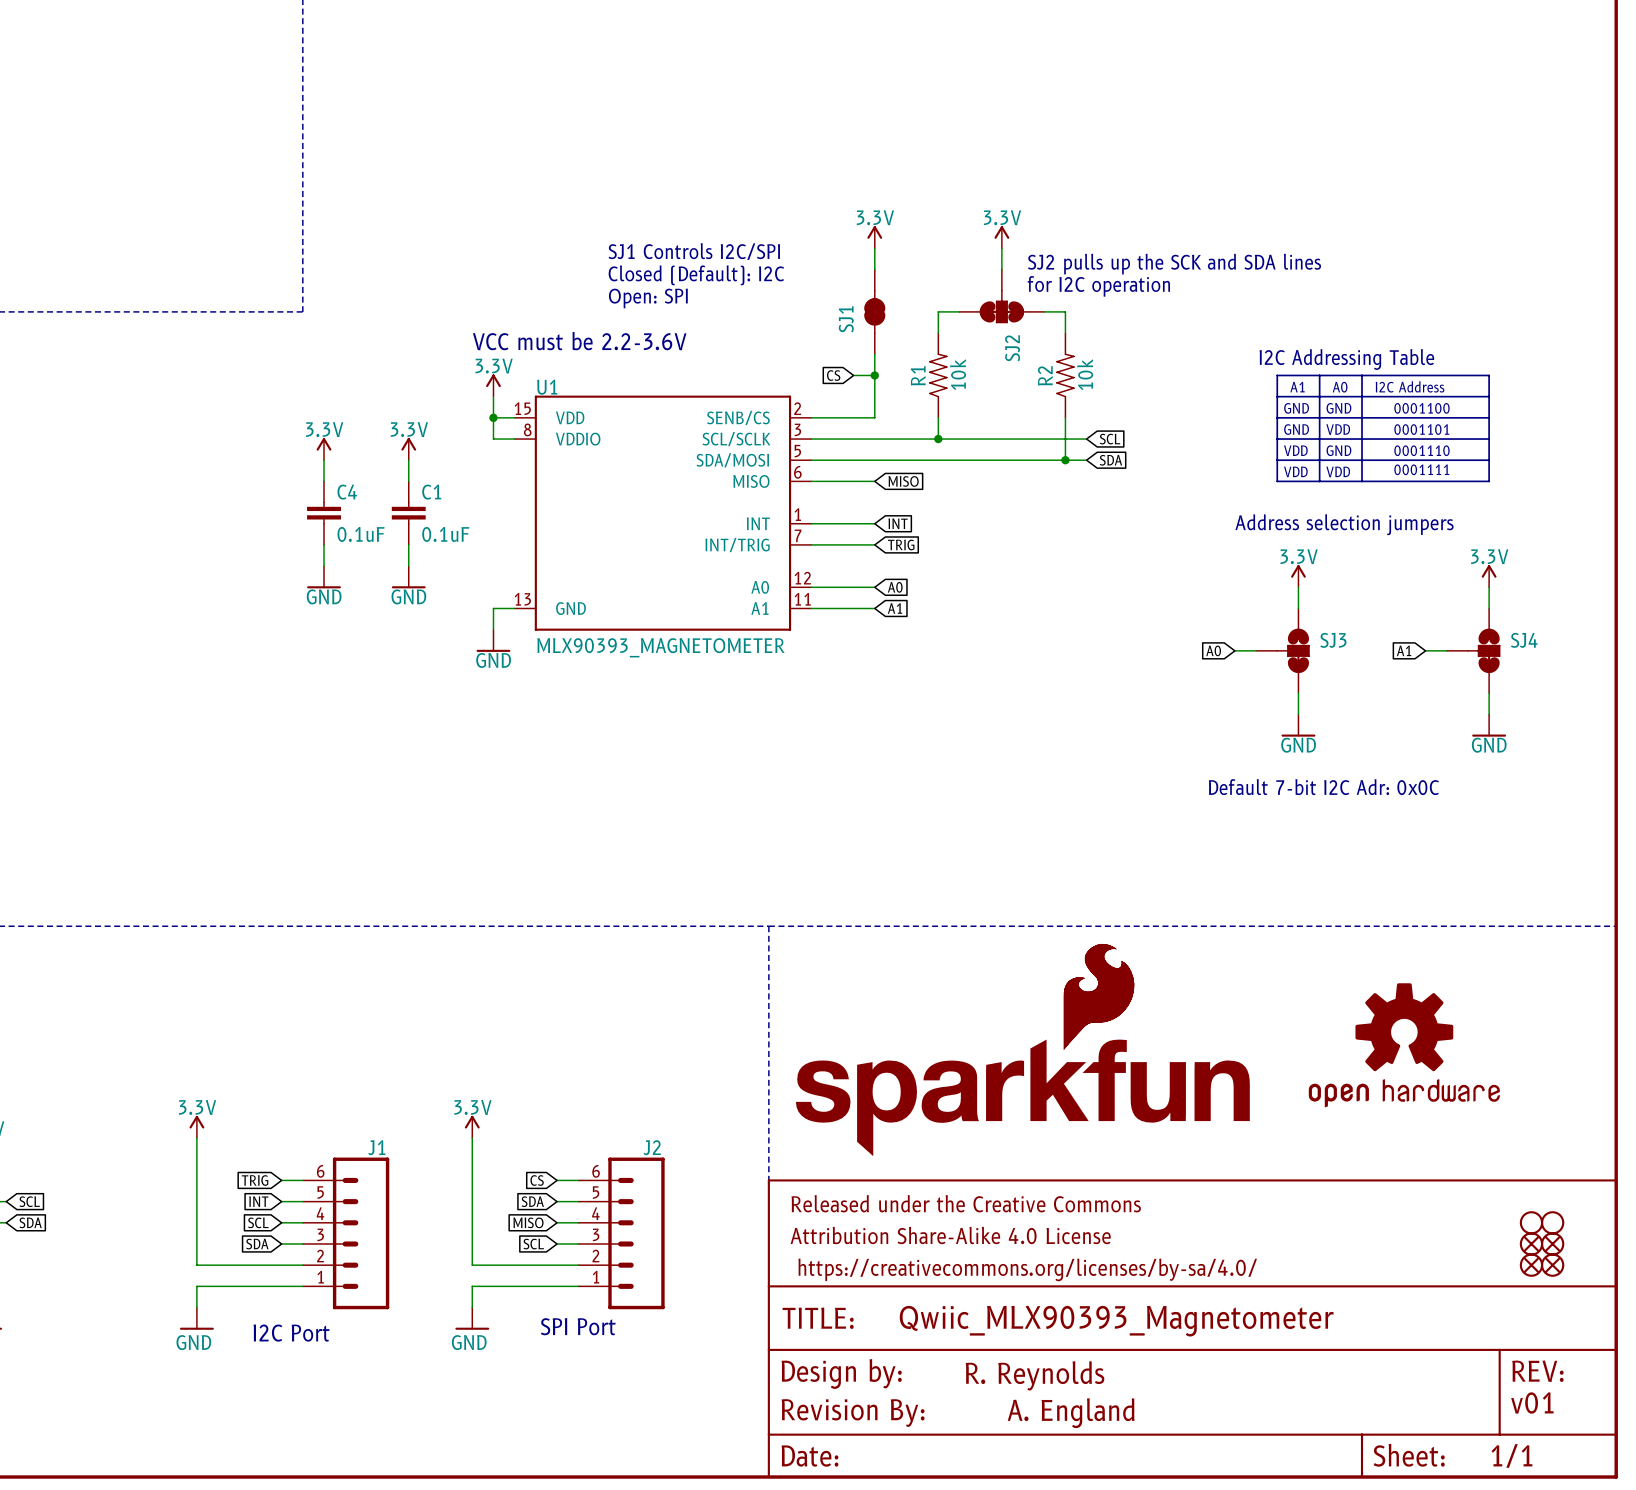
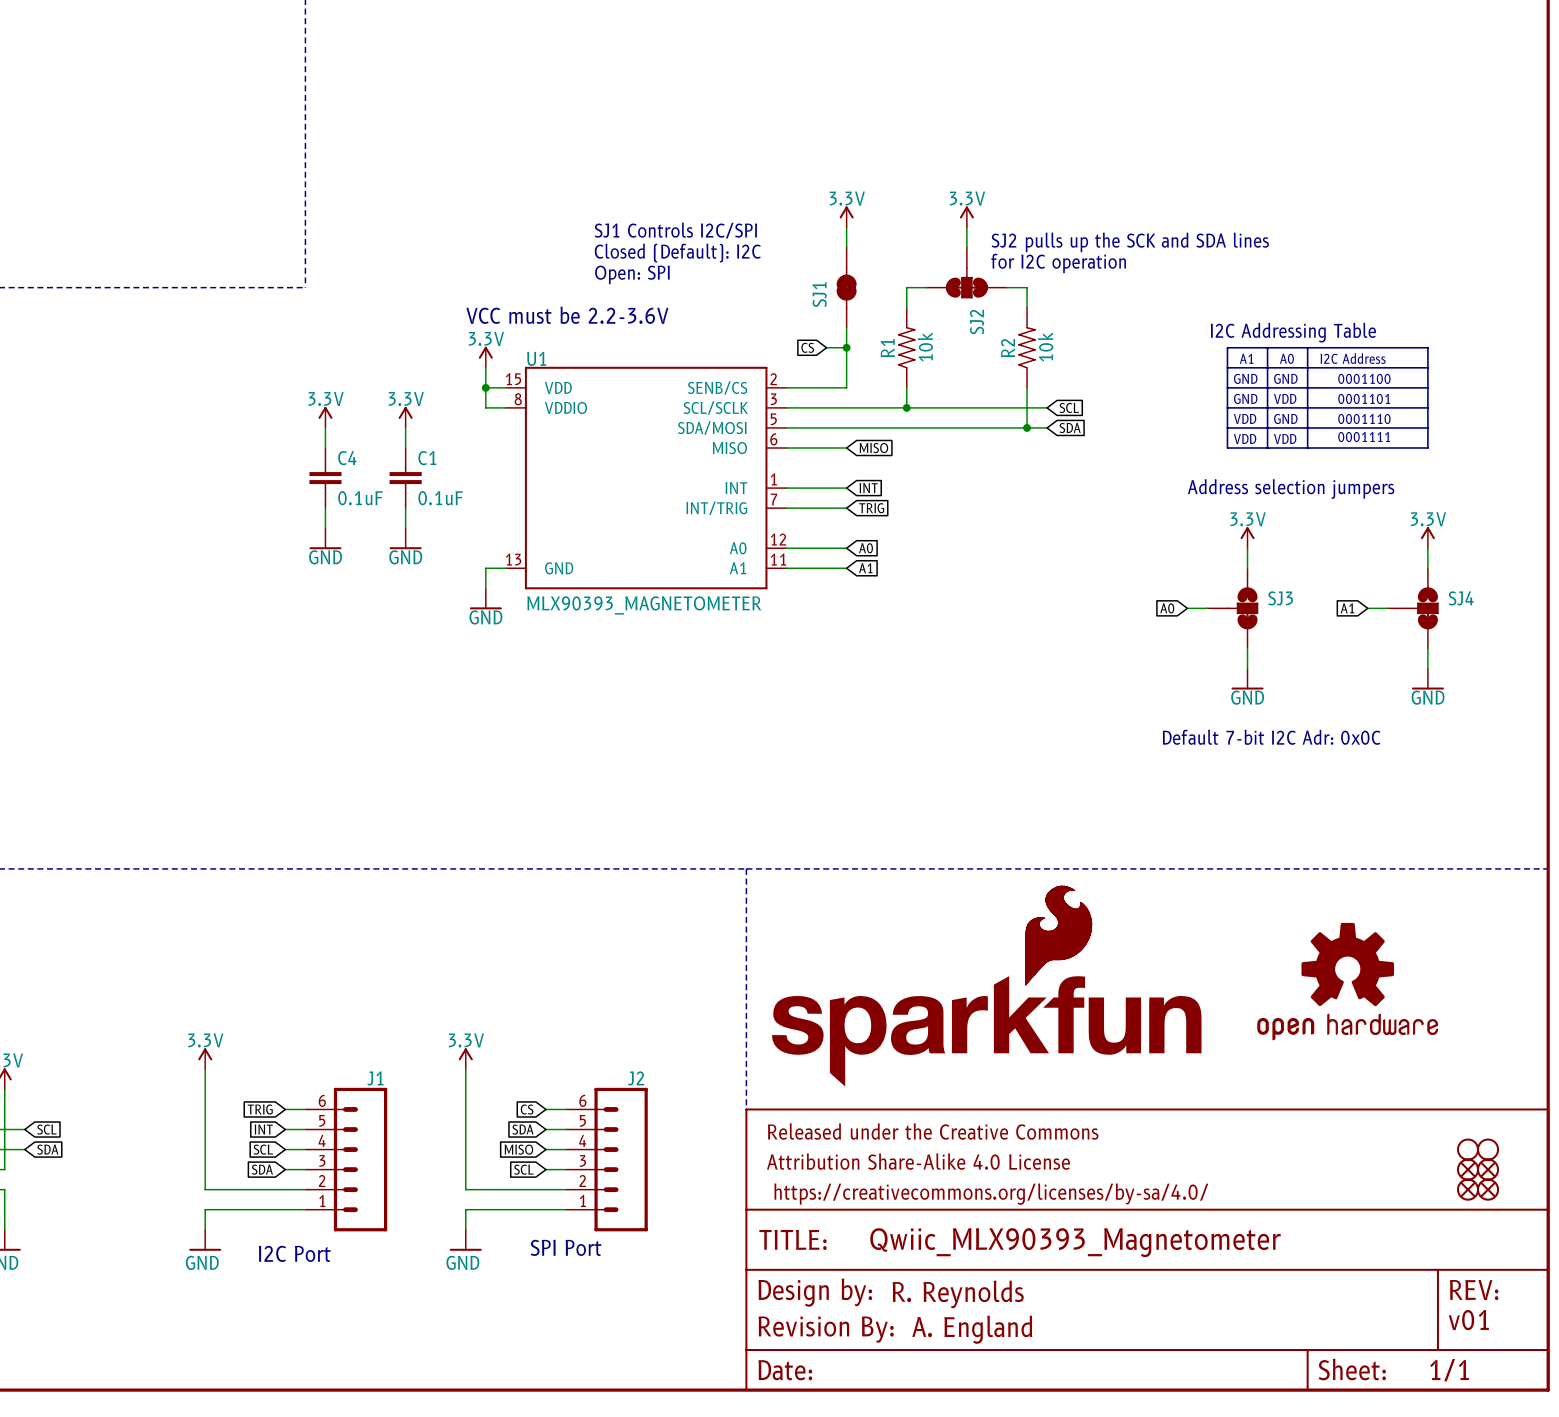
text position: R. Reynolds (1034, 1375) -> R. Reynolds (958, 1294)
text position: A. England (1071, 1413) -> A. England (972, 1329)

